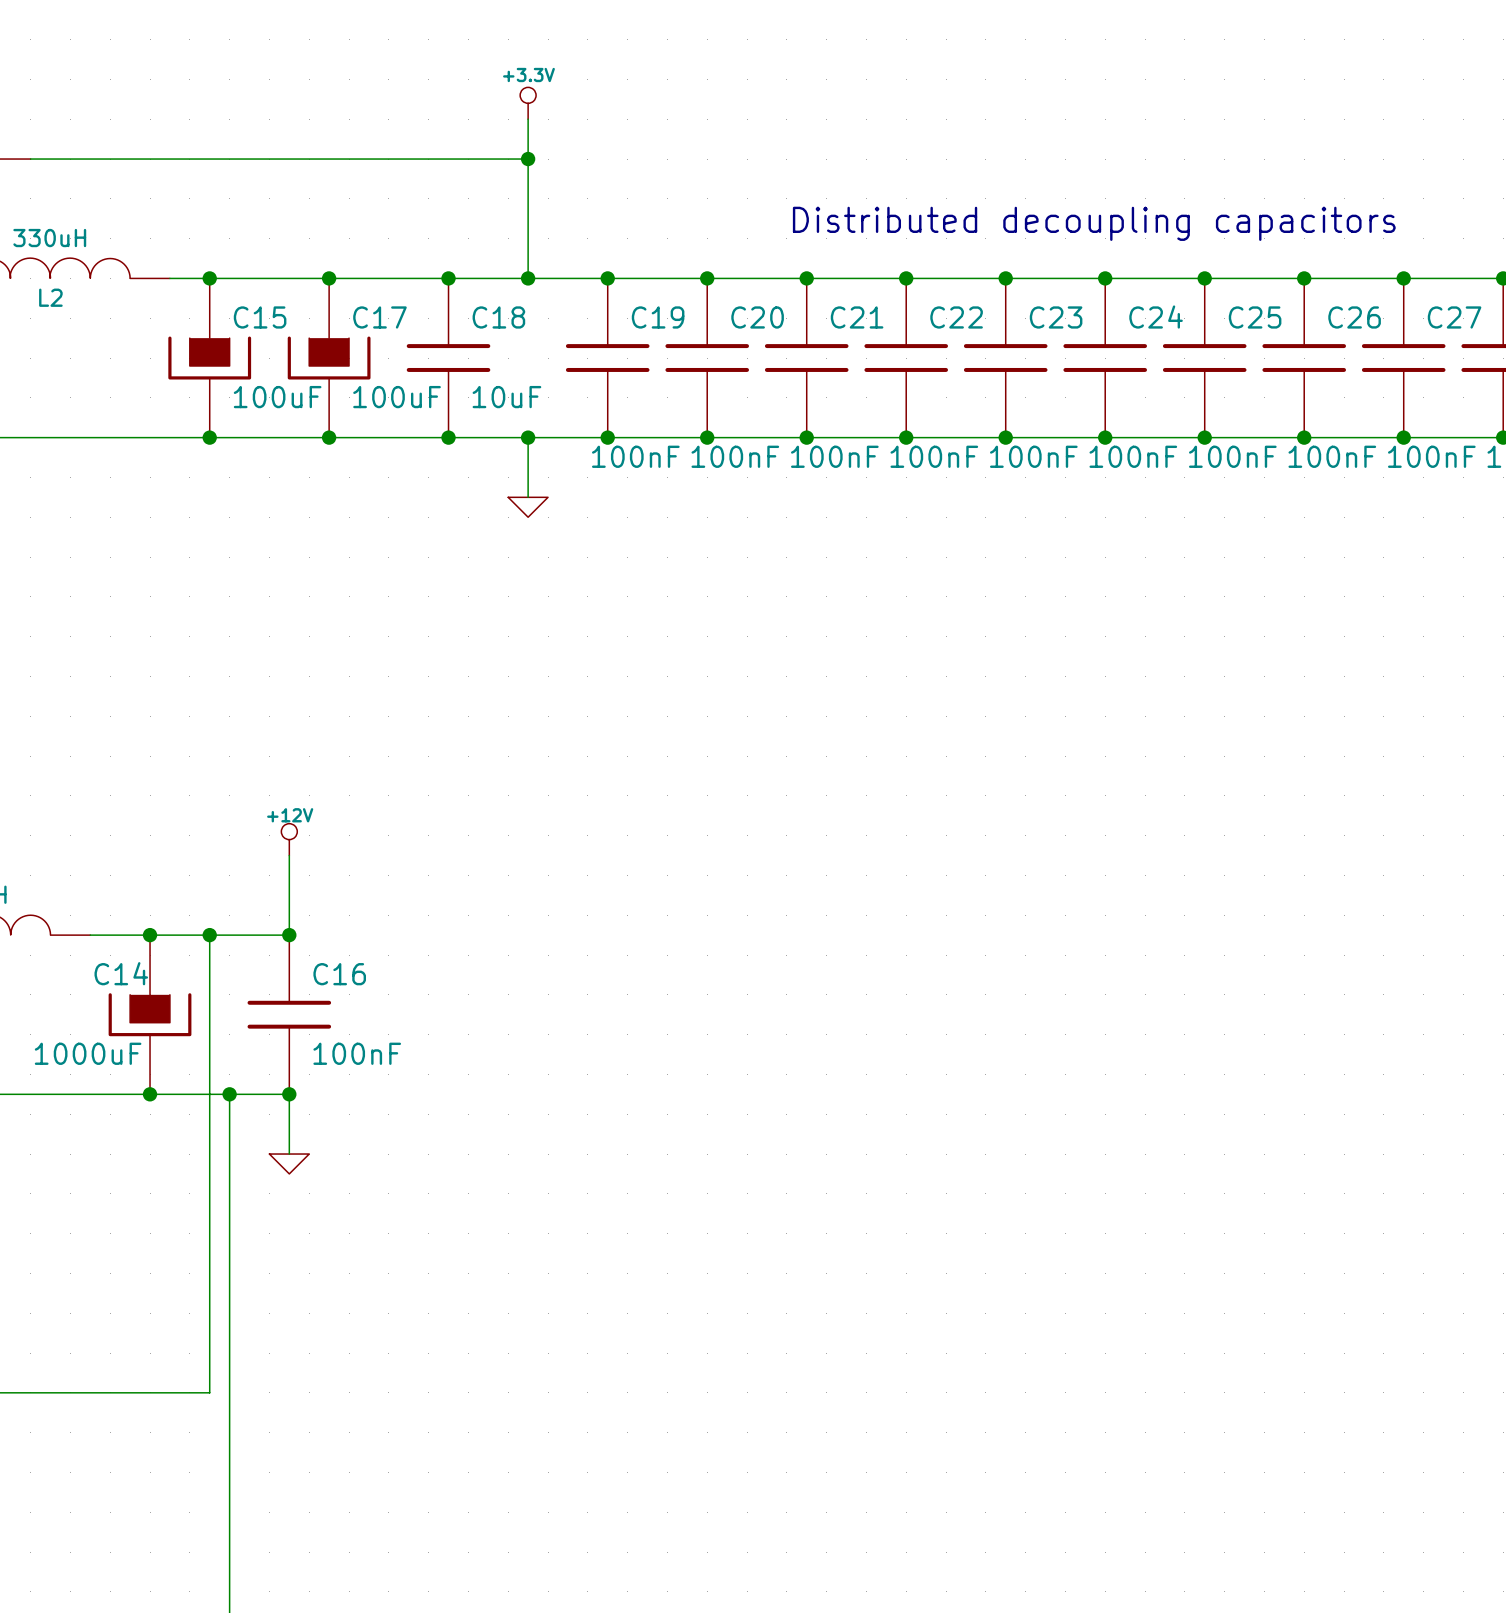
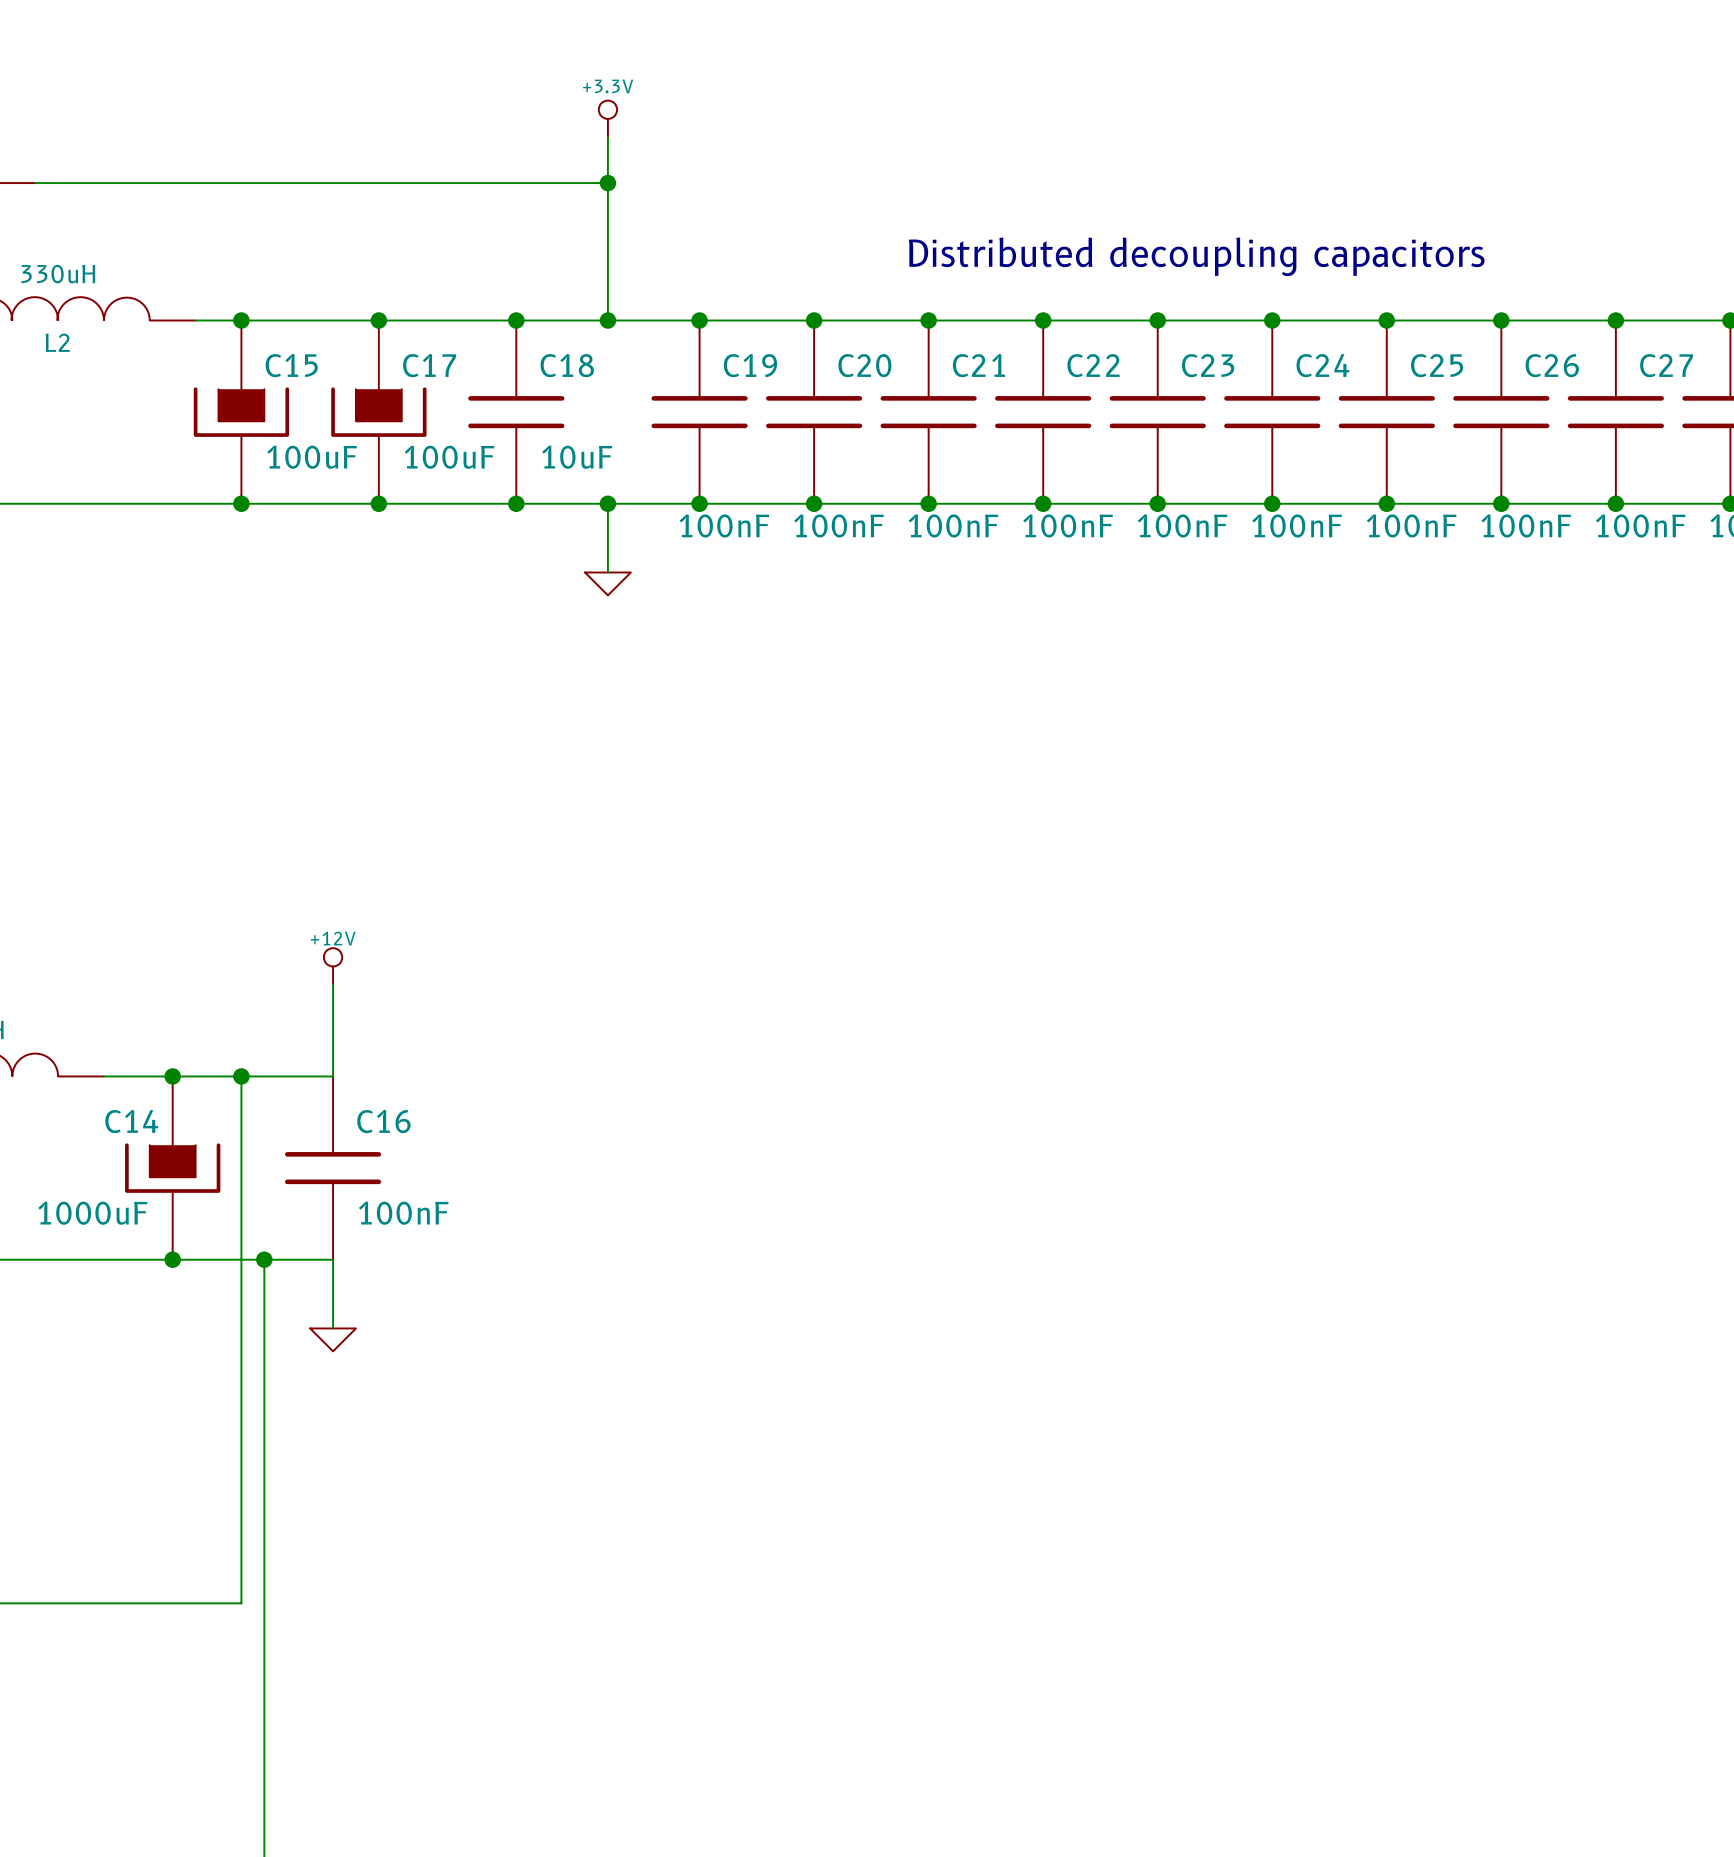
junction: (289, 935) -> none
junction: (289, 1094) -> none

